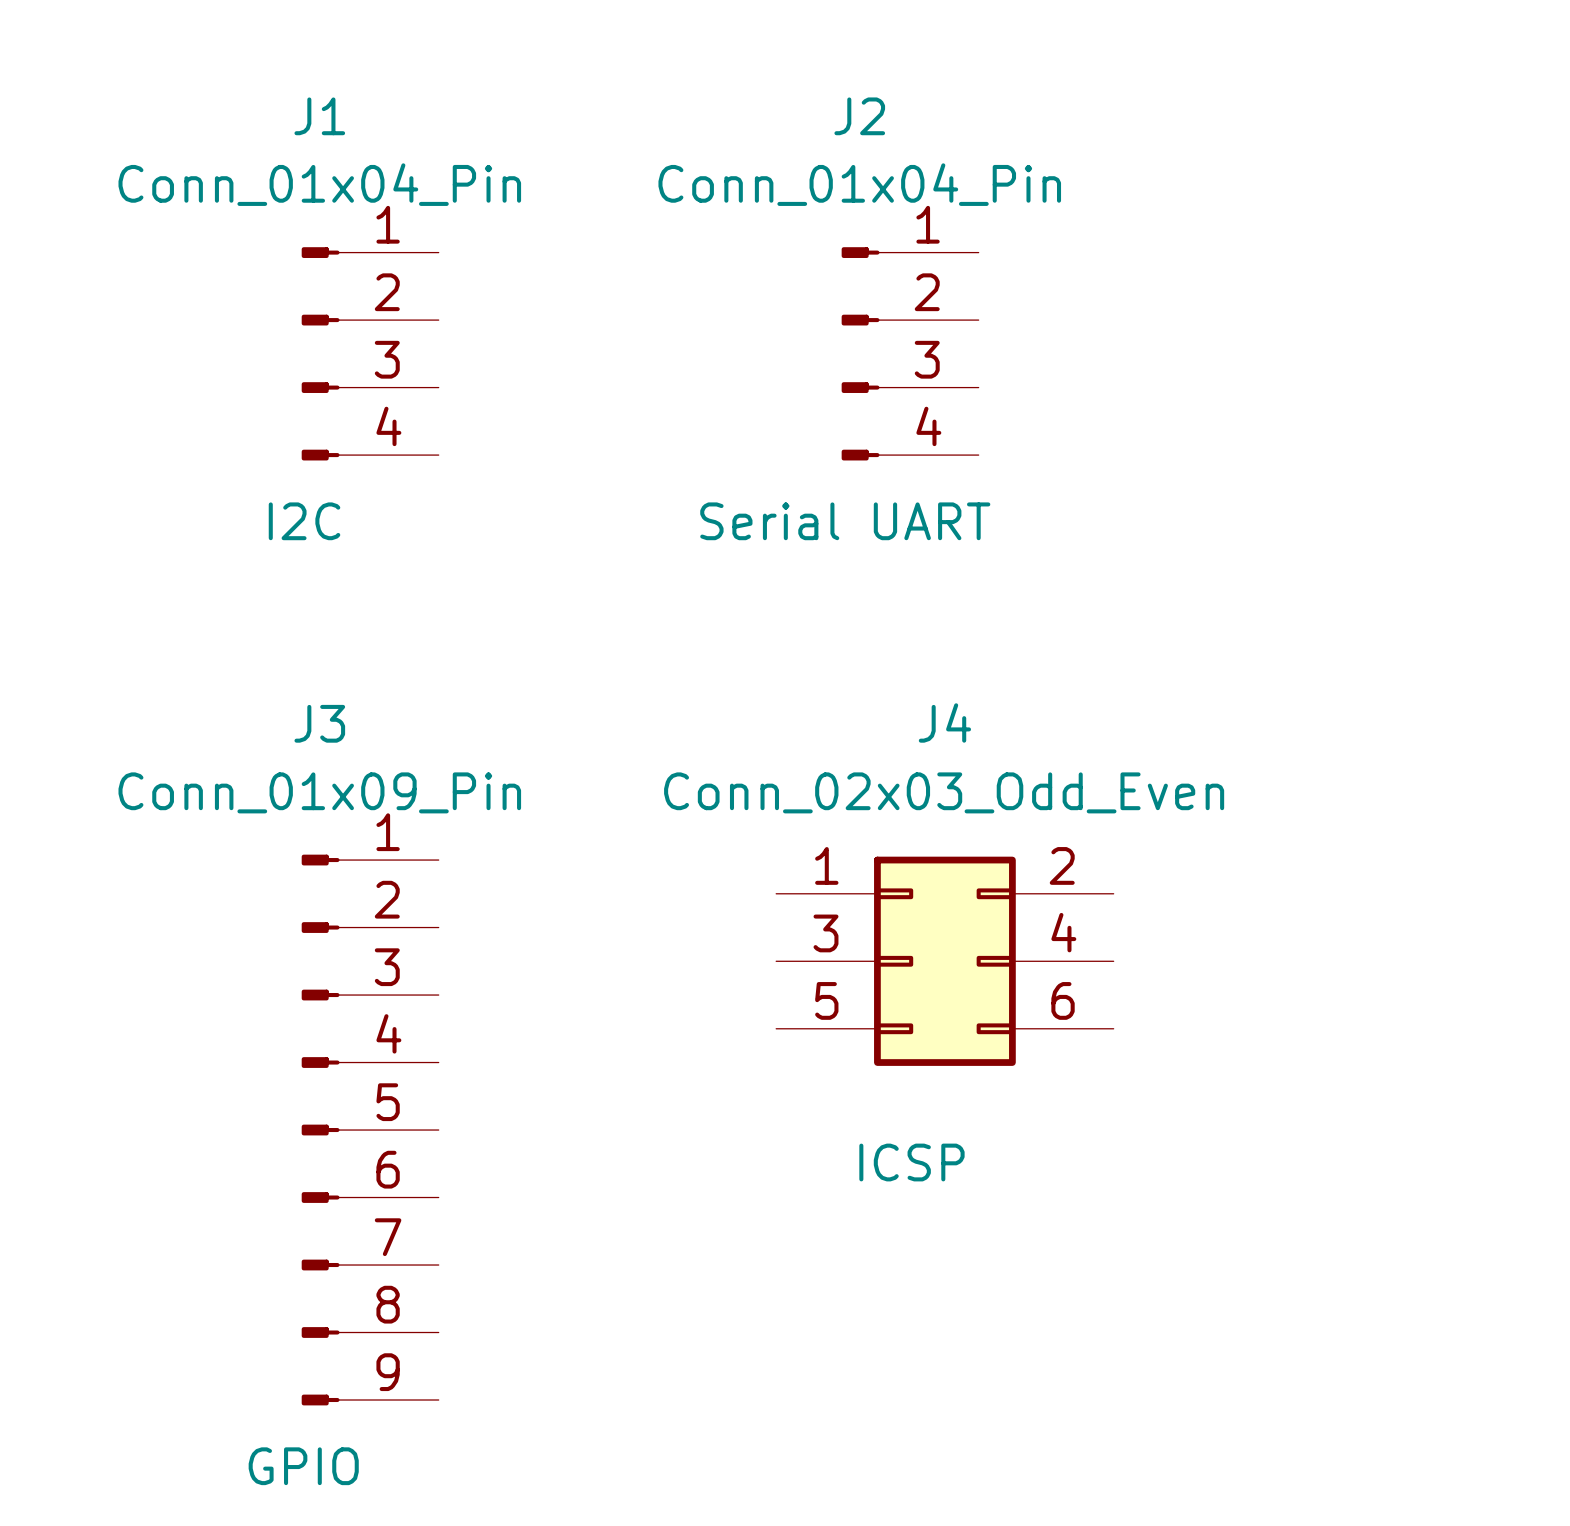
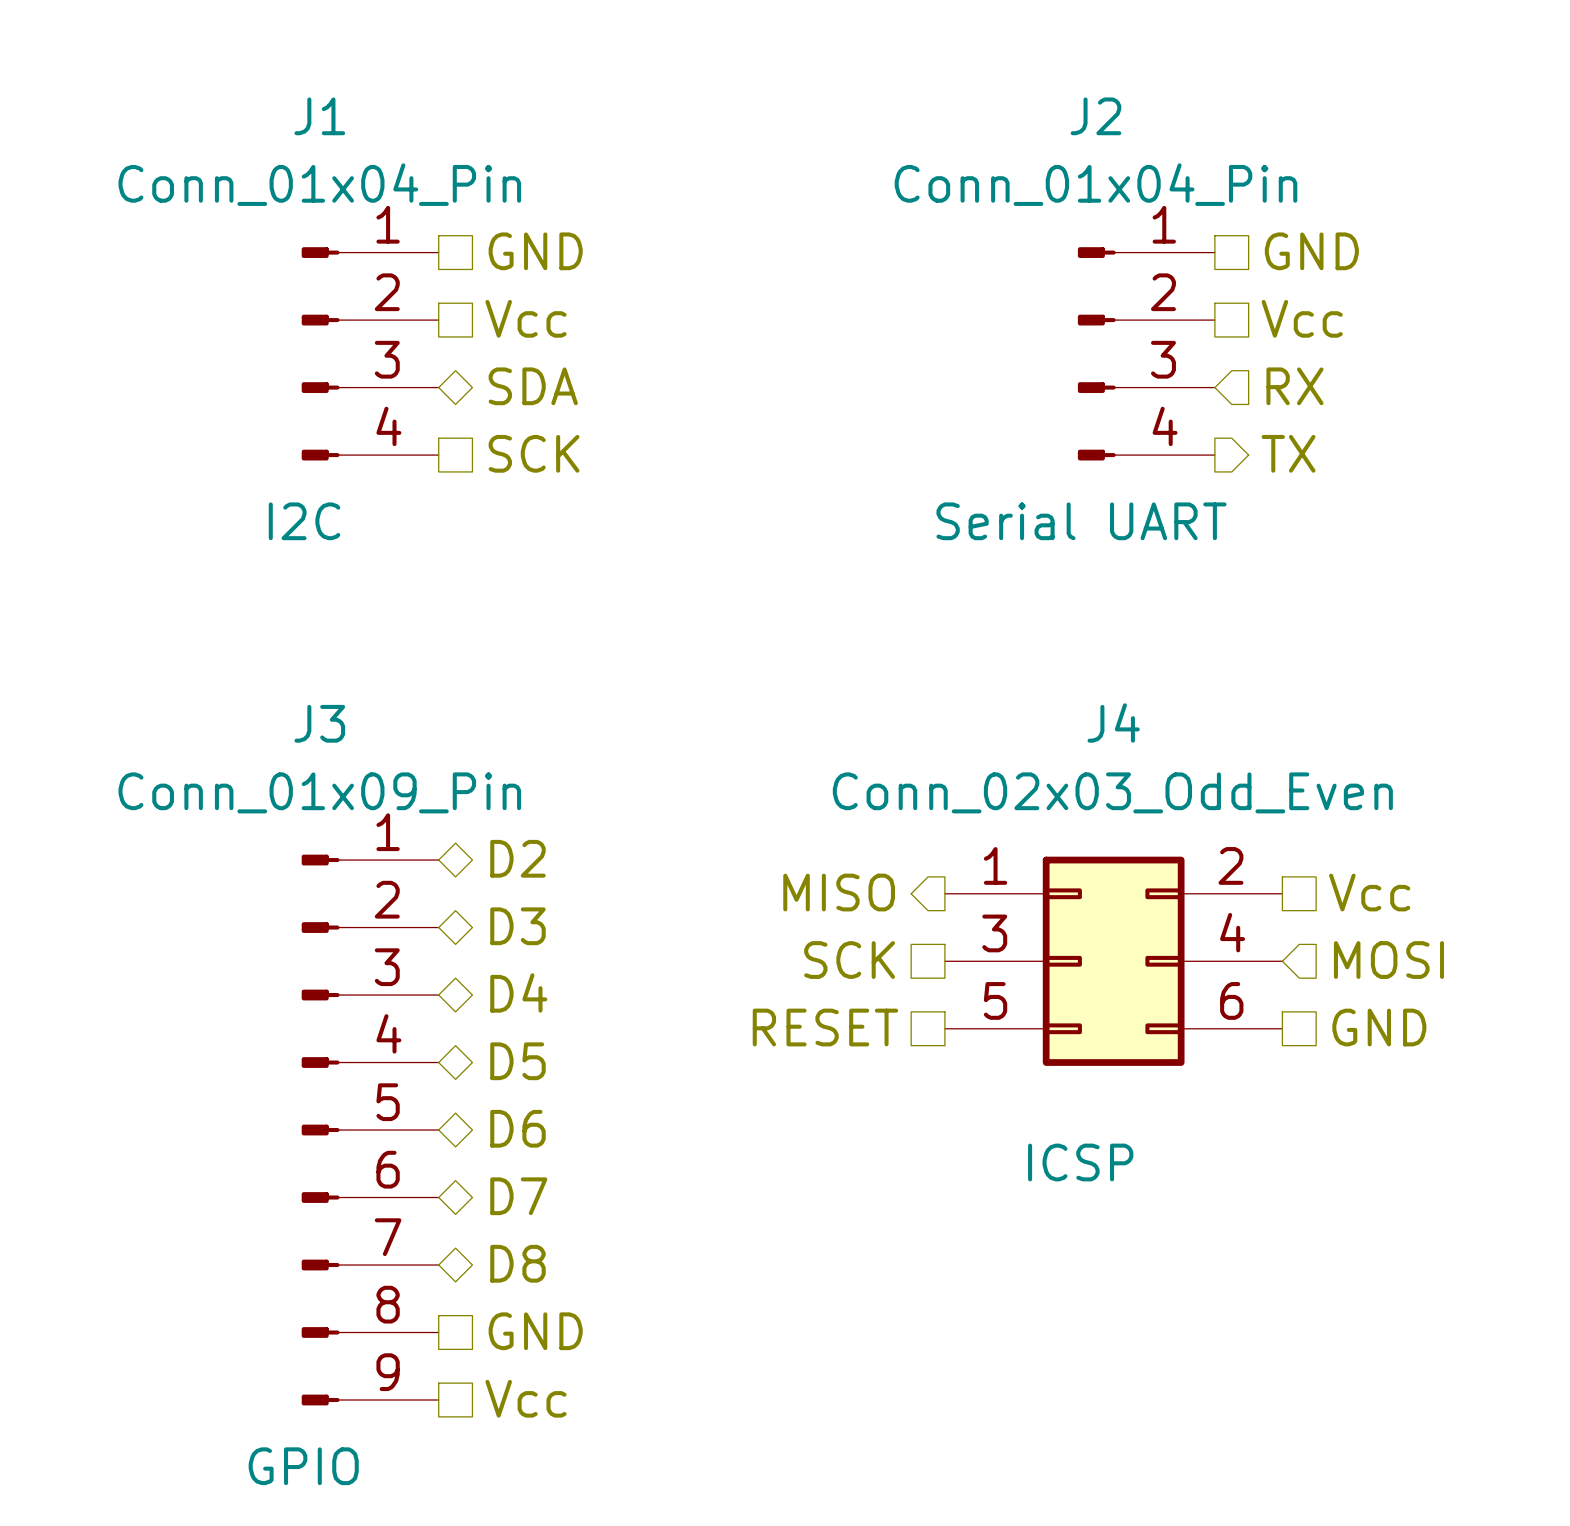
hierarchical label: none -> GND (535, 251)
hierarchical label: none -> GND (1311, 251)
hierarchical label: none -> Vcc (526, 318)
hierarchical label: none -> Vcc (1302, 318)
J2 position: (910, 353) -> (1146, 353)
hierarchical label: none -> SDA (533, 386)
hierarchical label: none -> RX (1294, 386)
hierarchical label: none -> SCK (534, 453)
hierarchical label: none -> TX (1288, 453)
hierarchical label: none -> D2 (517, 858)
hierarchical label: none -> MISO (839, 892)
hierarchical label: none -> Vcc (1369, 892)
hierarchical label: none -> D3 (517, 926)
hierarchical label: none -> SCK (849, 960)
hierarchical label: none -> MOSI (1388, 960)
J4 position: (944, 961) -> (1113, 961)
hierarchical label: none -> D4 (518, 992)
hierarchical label: none -> RESET (825, 1027)
hierarchical label: none -> GND (1379, 1027)
hierarchical label: none -> D5 (517, 1061)
hierarchical label: none -> D6 (517, 1128)
hierarchical label: none -> D7 (518, 1196)
hierarchical label: none -> D8 (517, 1263)
hierarchical label: none -> GND (535, 1331)
hierarchical label: none -> Vcc (526, 1398)

